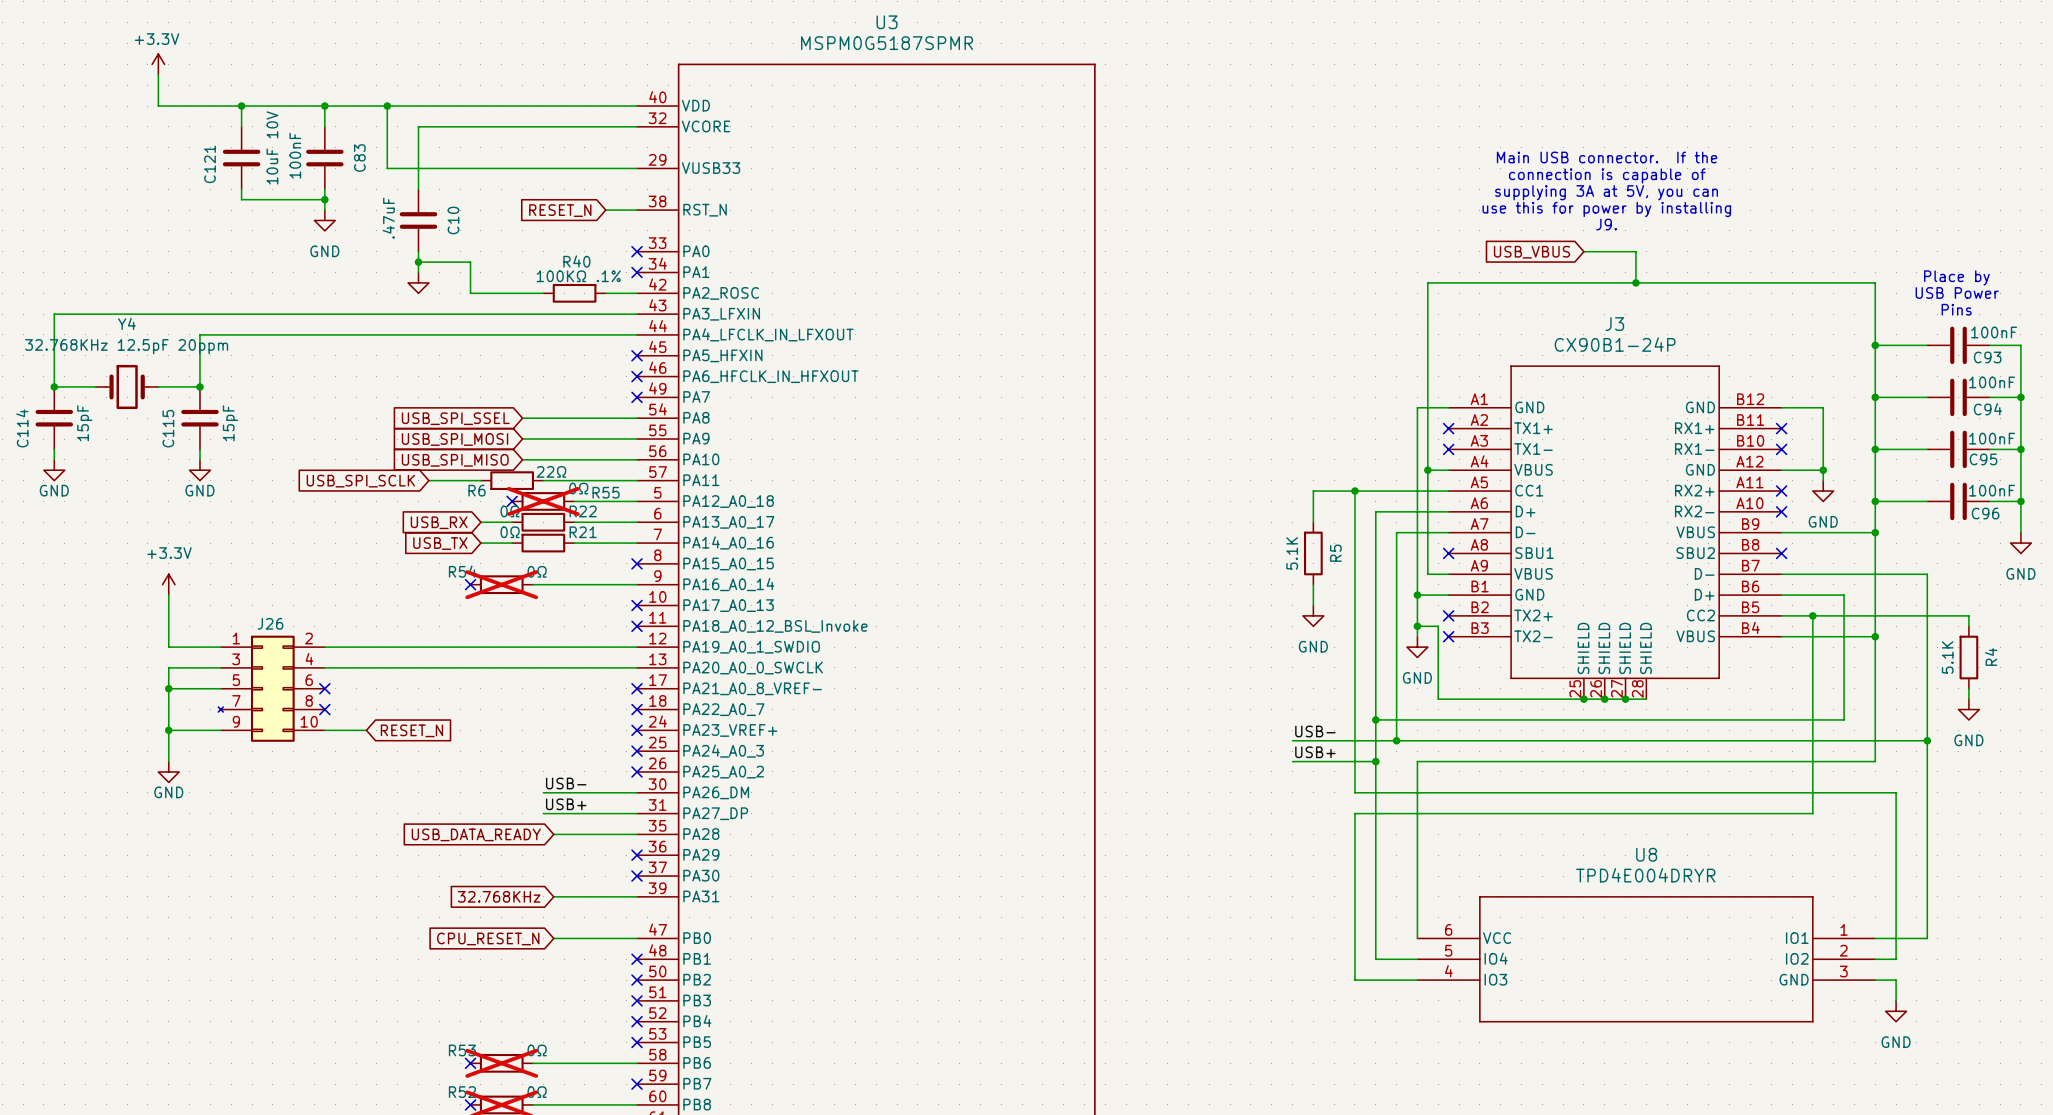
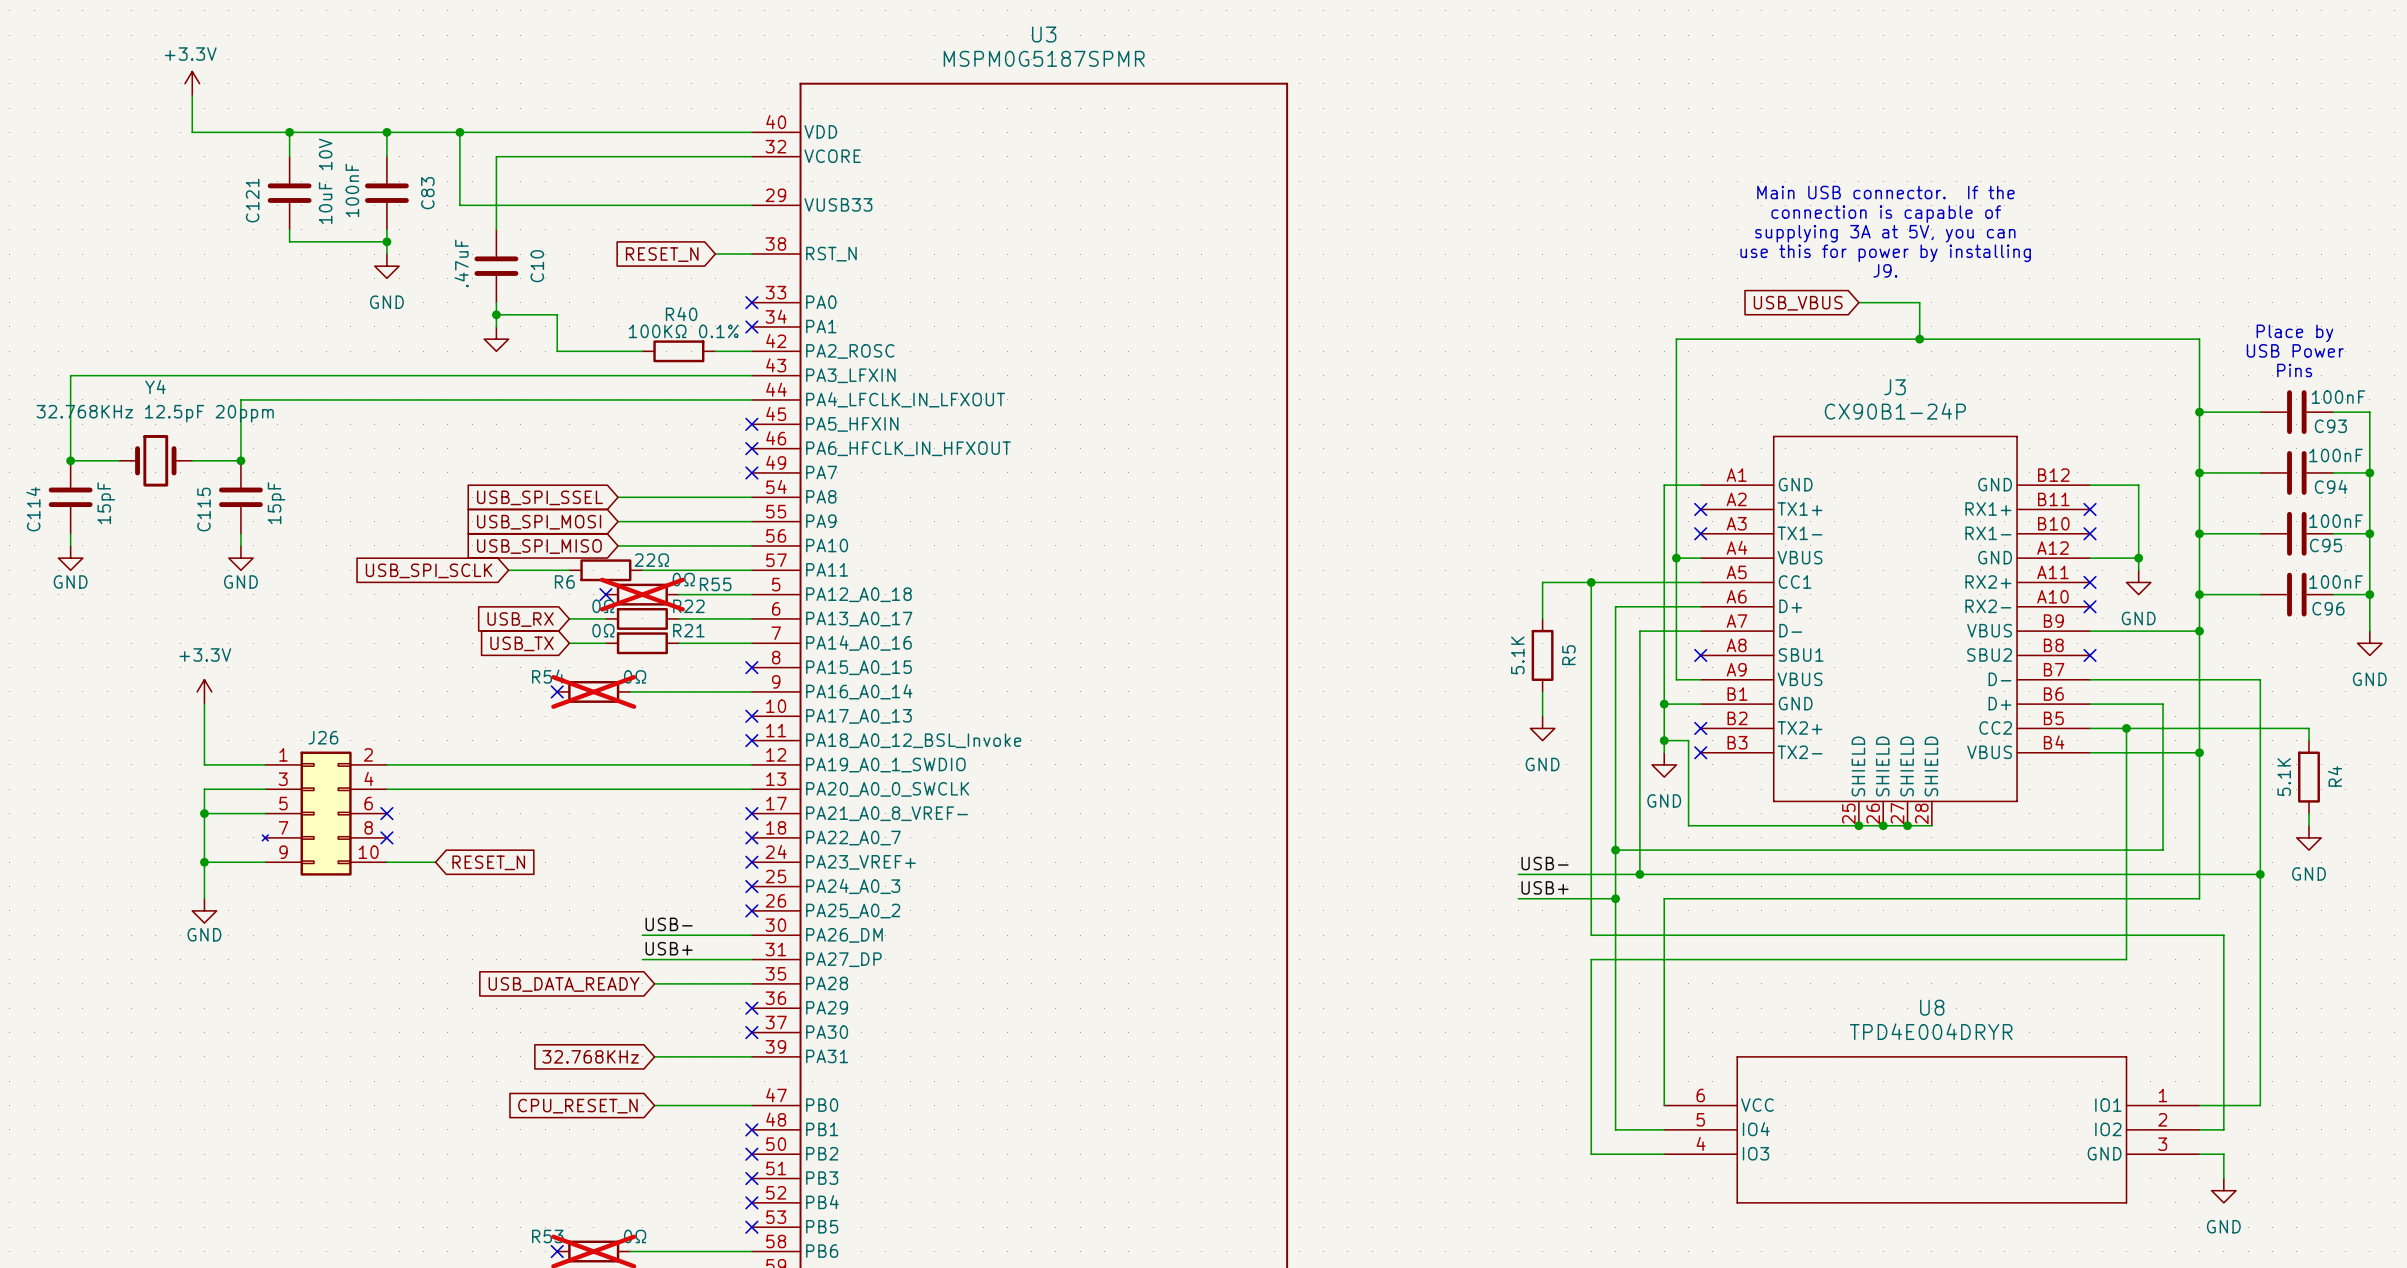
R40 value: 100KΩ .1% (578, 276) -> 100KΩ 0.1% (683, 331)

